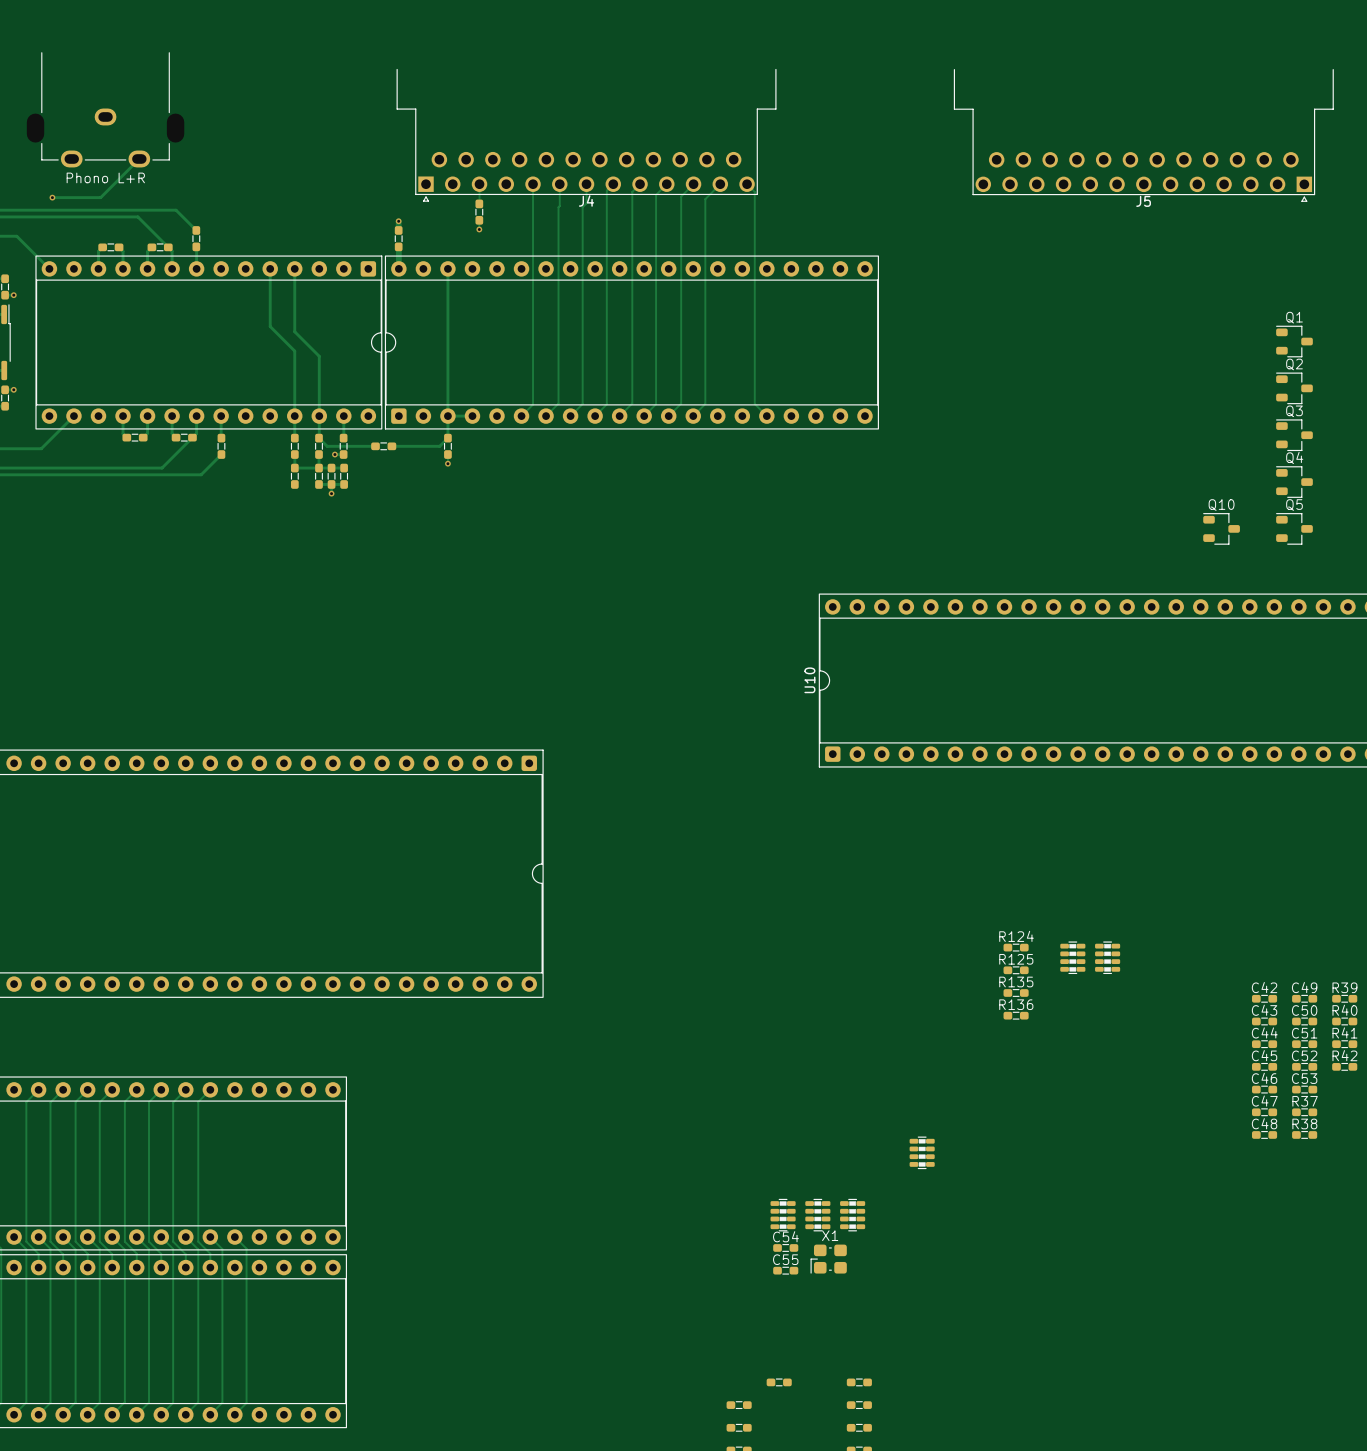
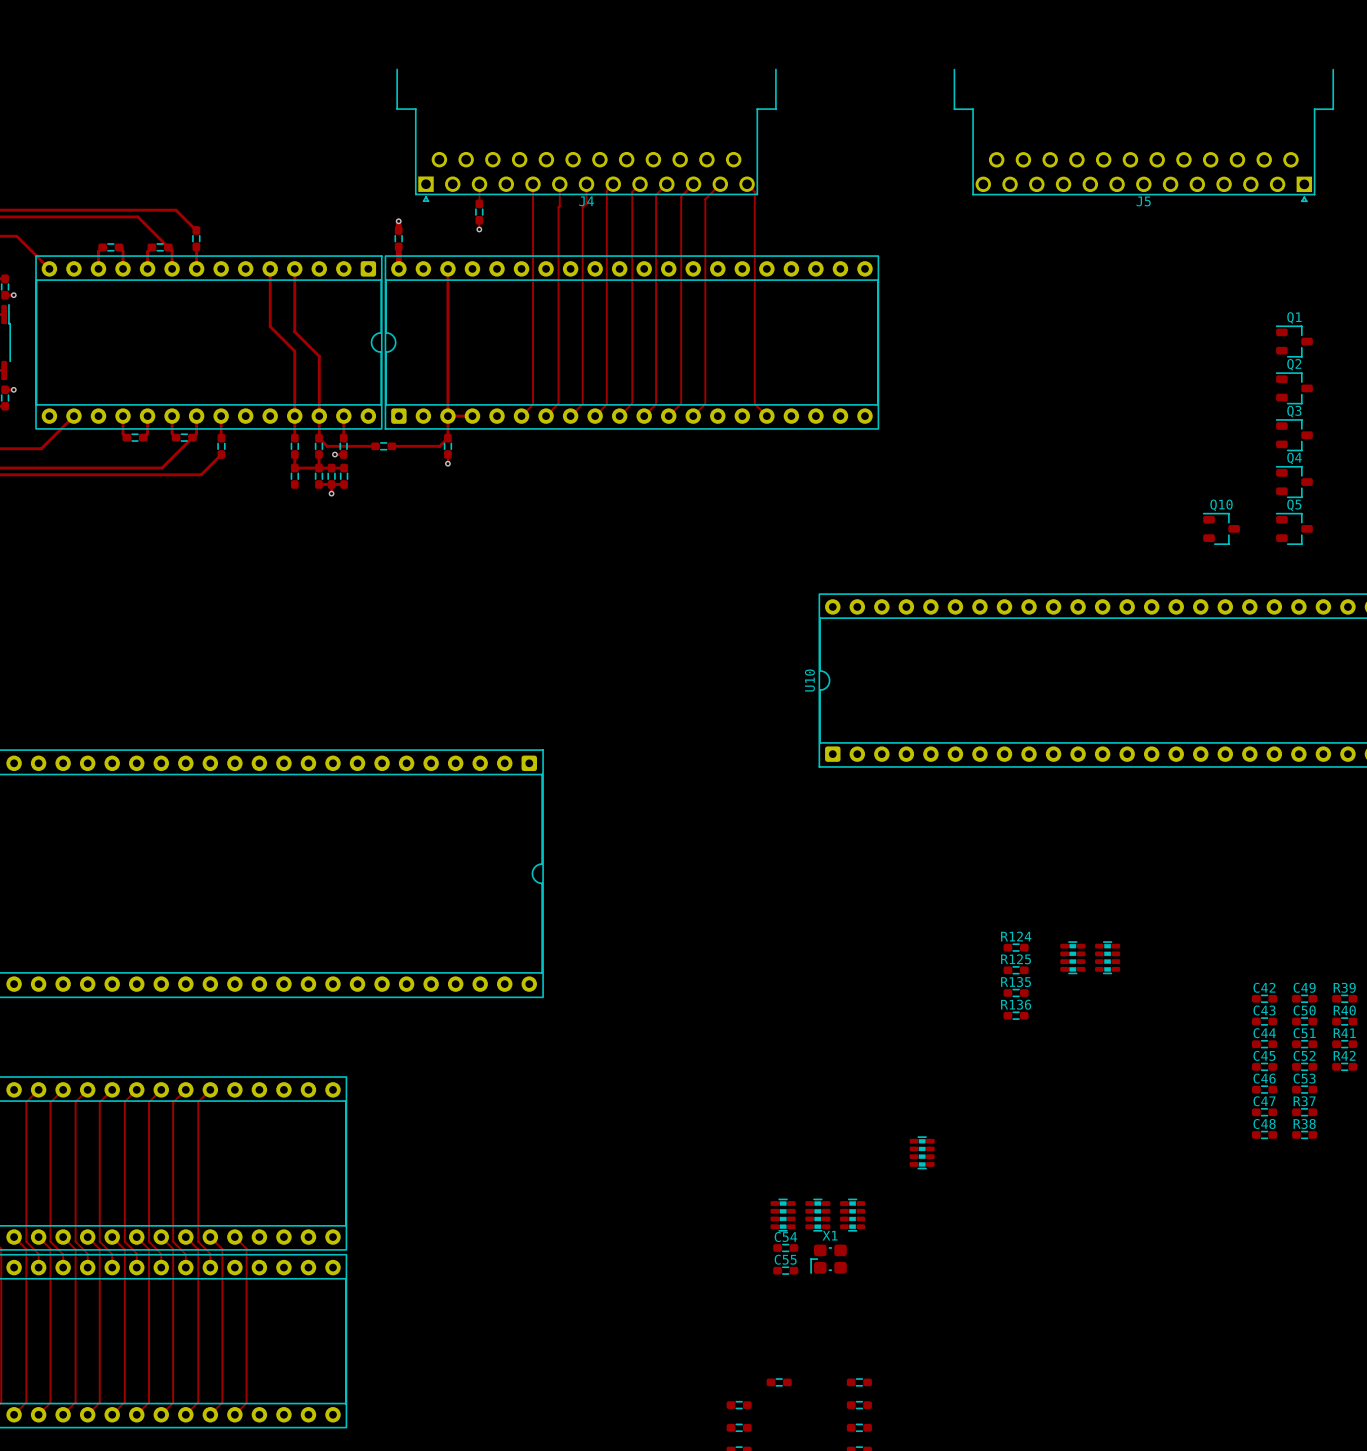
part: Phono L+R (105, 109) -> none
track: (139, 158) (100, 197) (52, 197) -> none
via: (52, 197) -> none

